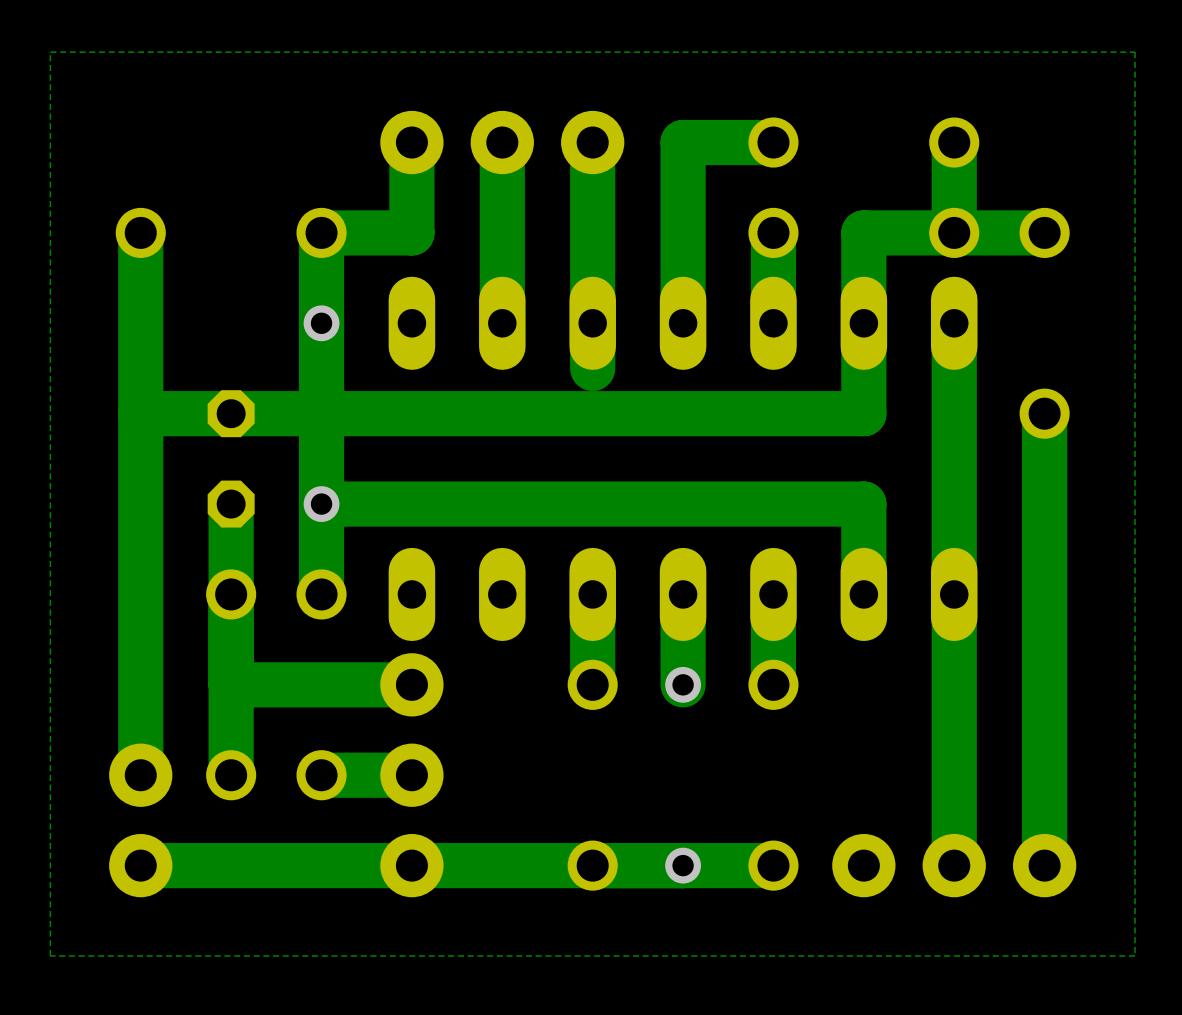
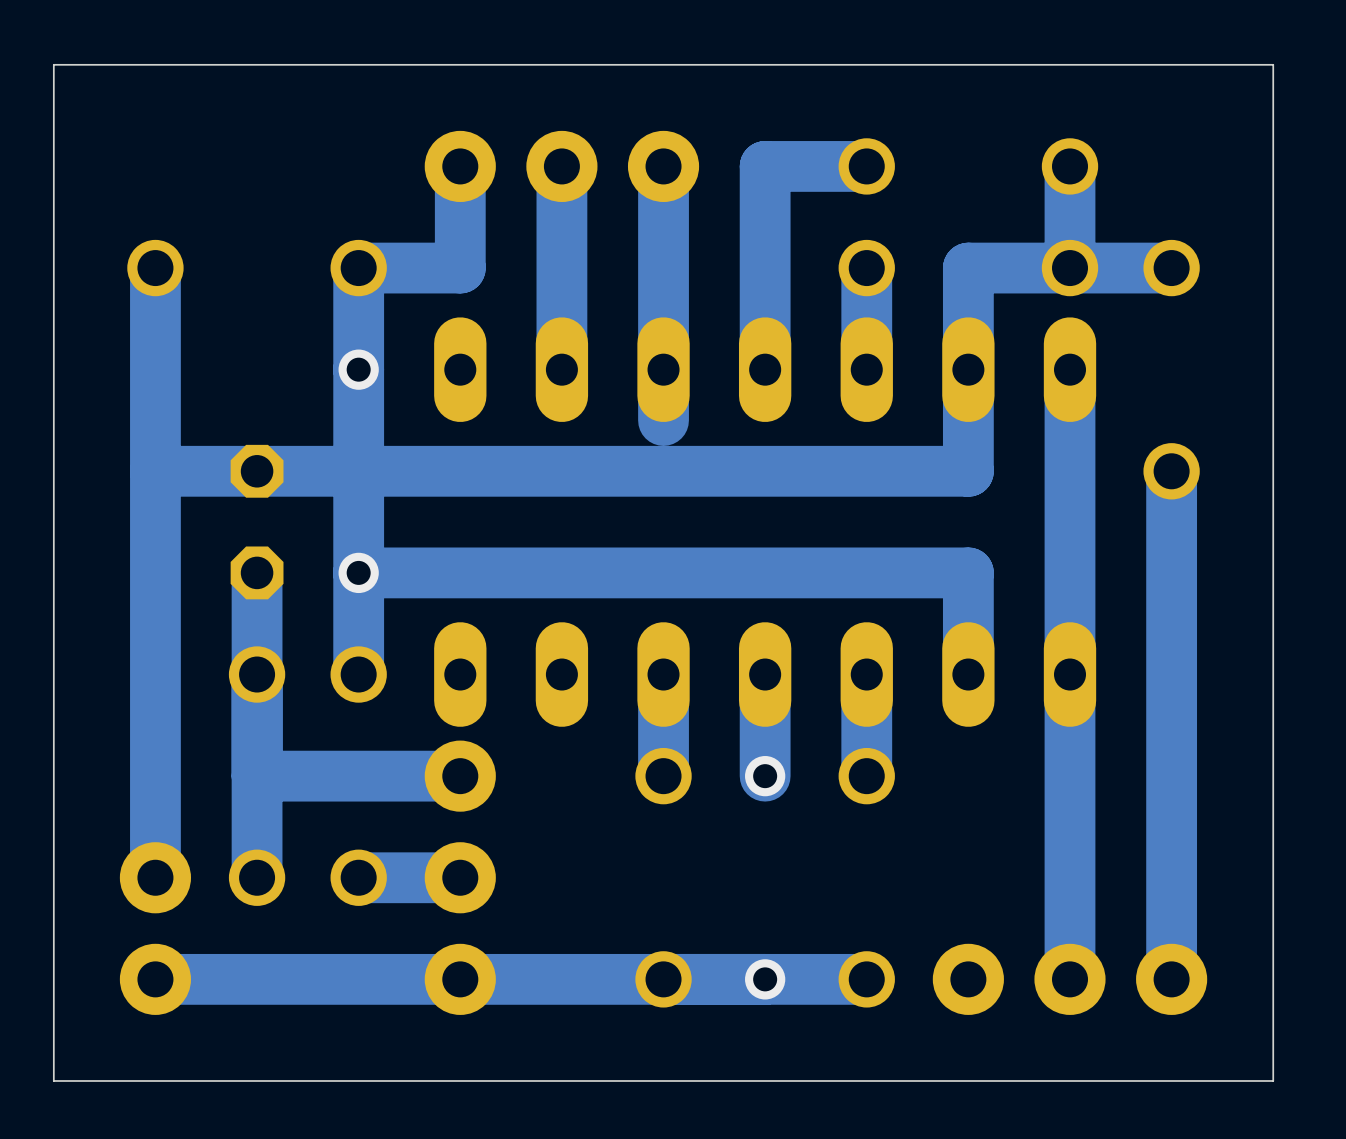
zone outline: (1135, 52) (1135, 956) (50, 956) (50, 52) (1135, 52) -> none
board edge: none -> (1273, 64) (1273, 1080) (53, 1080) (53, 64) (1273, 64)

